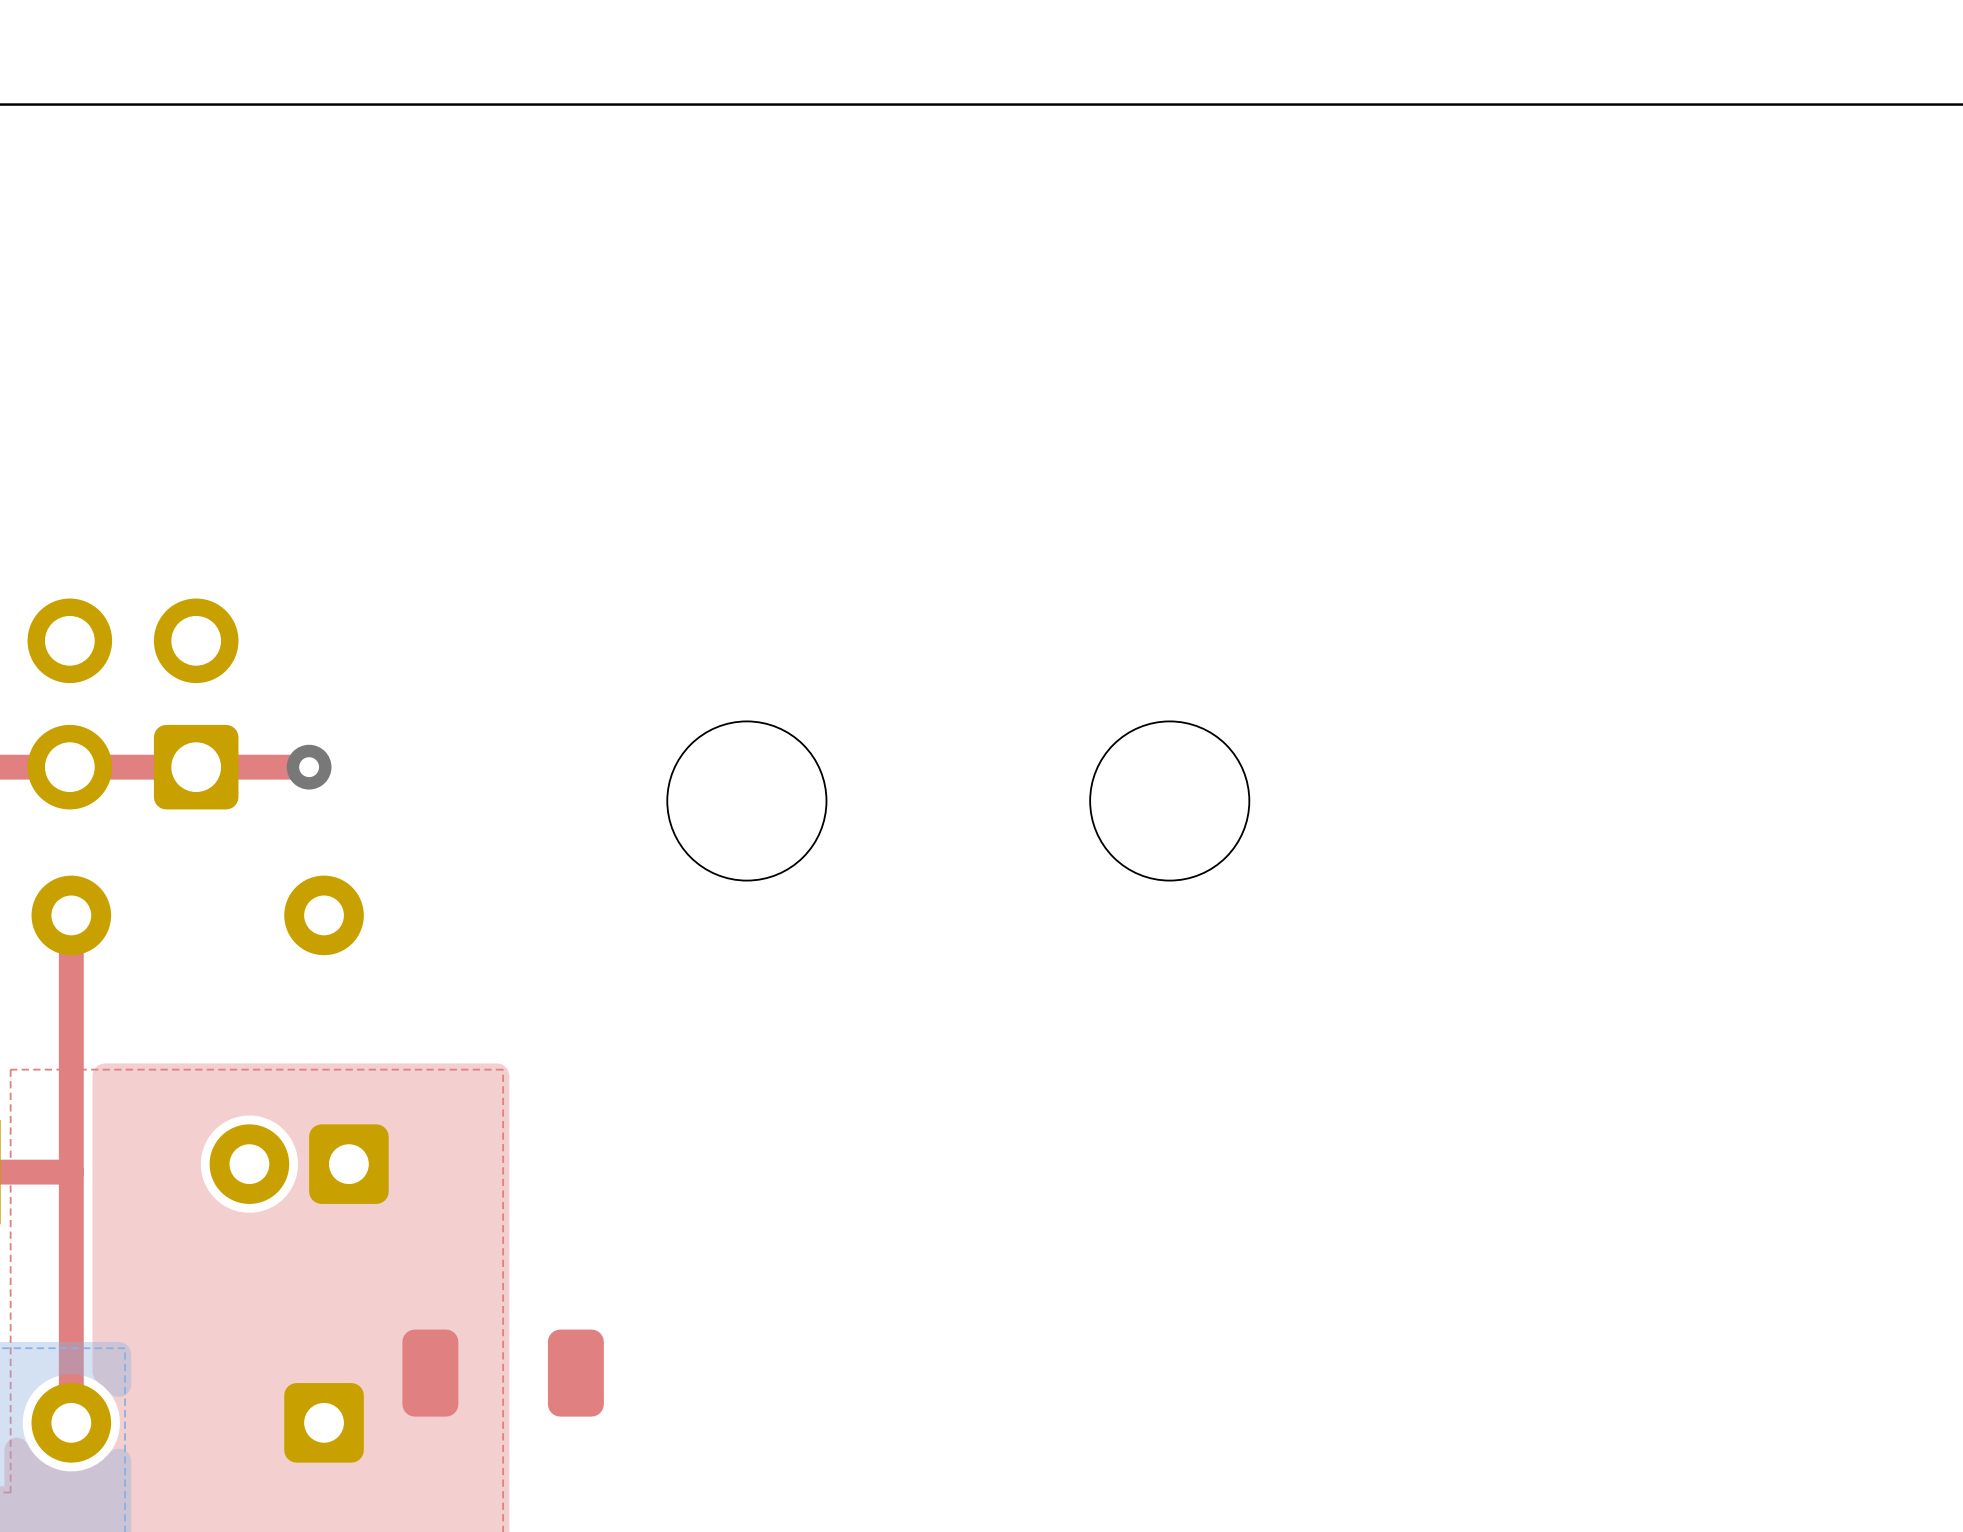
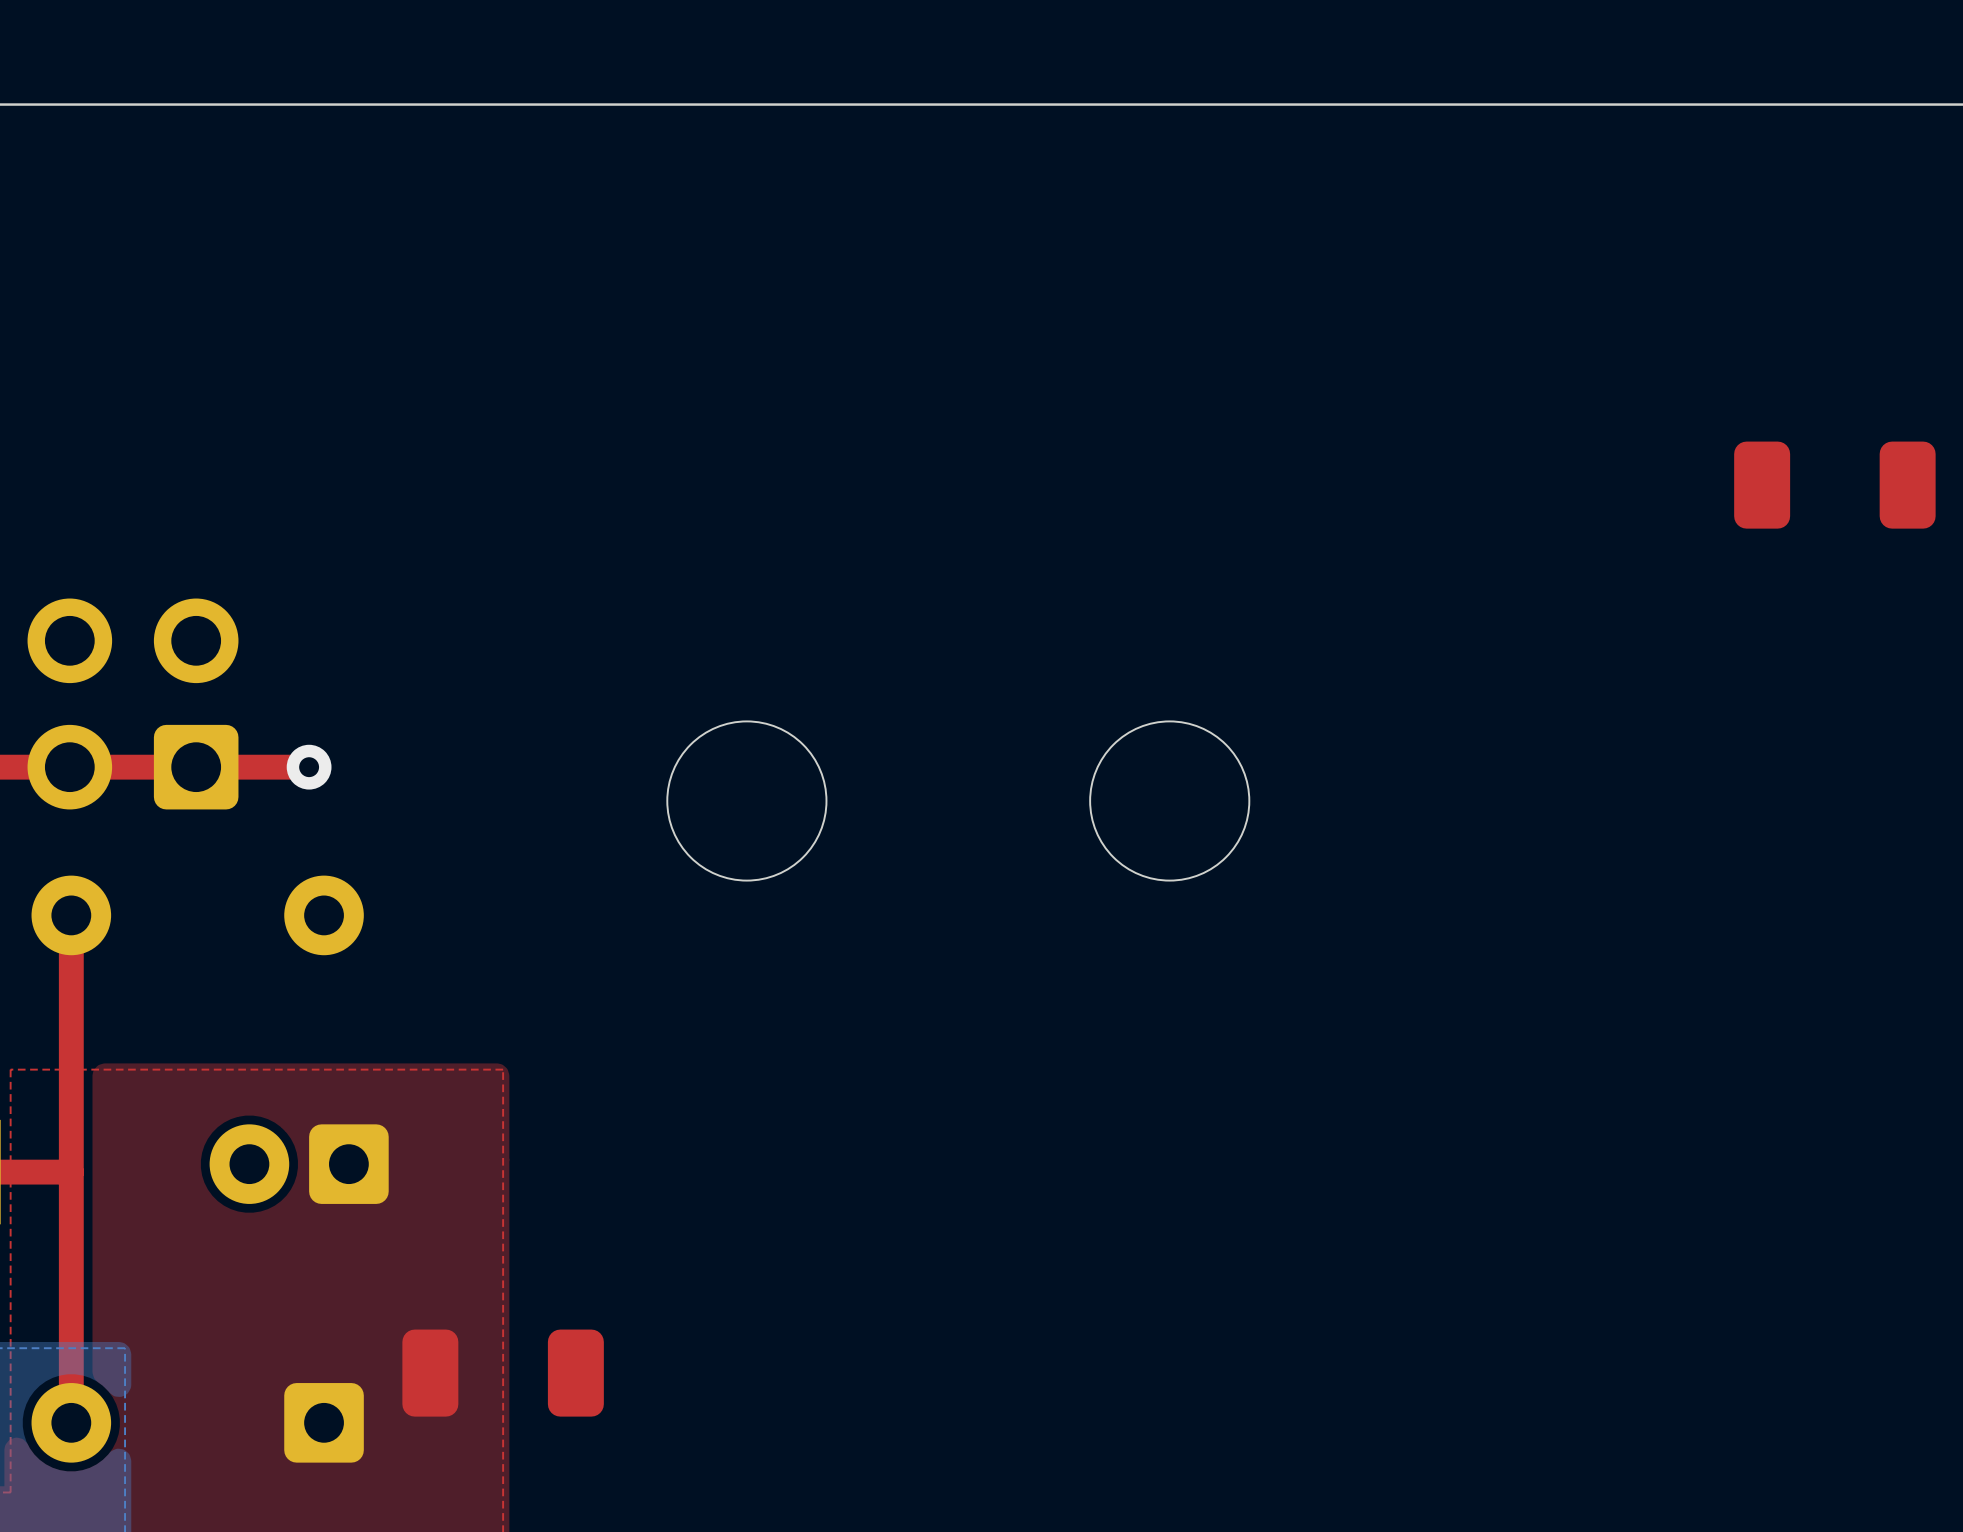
part: none -> (1834, 485)

